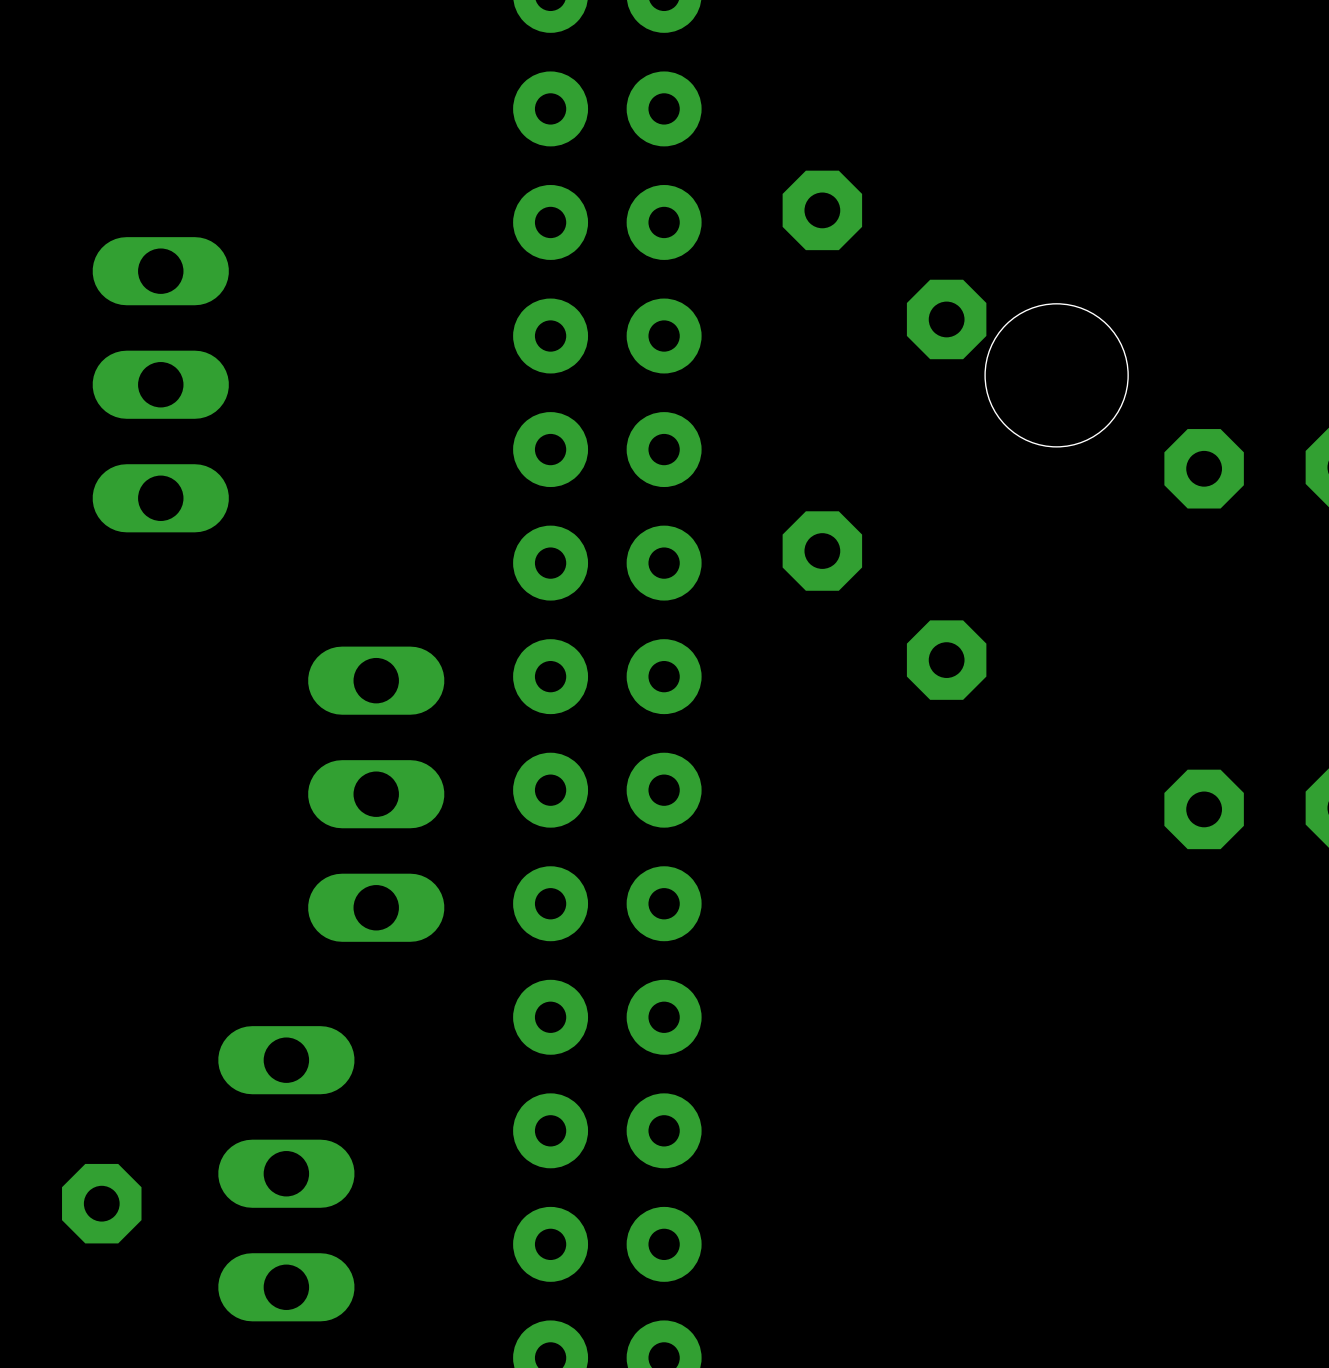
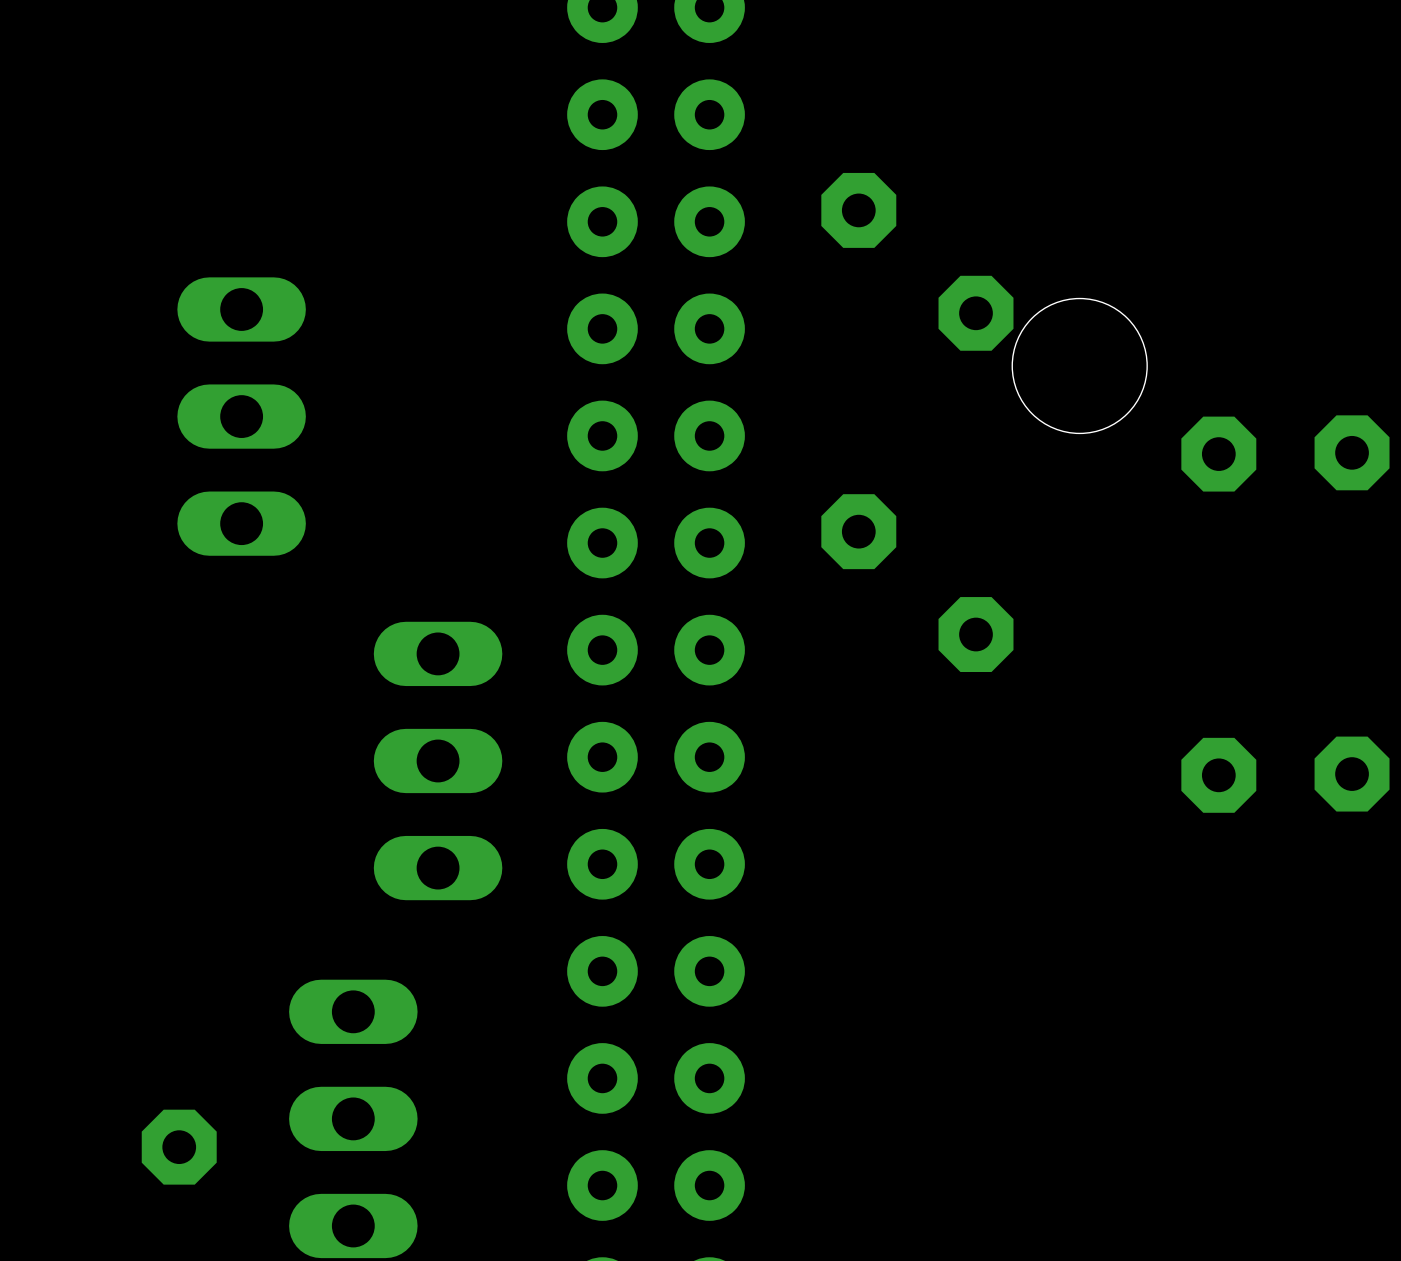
part position: (160, 384) -> (241, 416)

